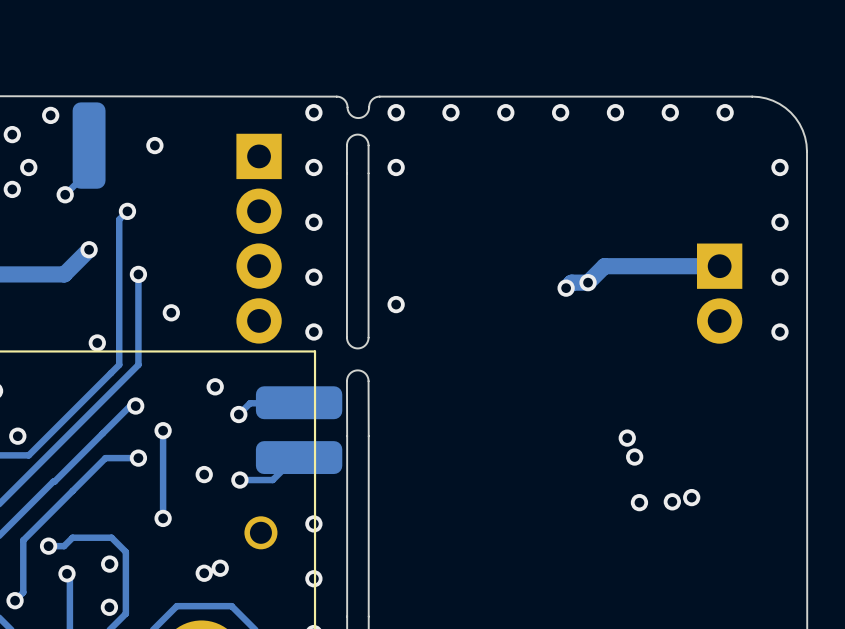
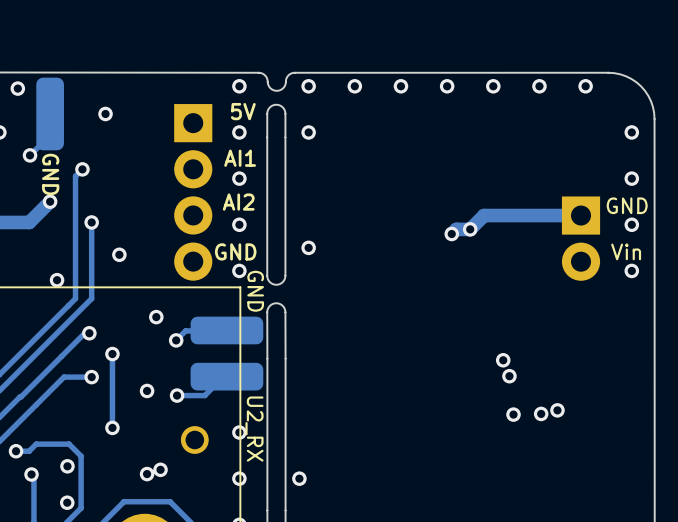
text: none -> 5V (243, 111)
text: none -> AI1 (240, 158)
text: none -> GND (50, 174)
text: none -> AI2 (238, 202)
text: none -> GND (627, 205)
text: none -> GND (235, 251)
text: none -> Vin (626, 251)
text: none -> GND (255, 291)
text: none -> U2_RX (254, 429)
via: none -> (299, 478)

